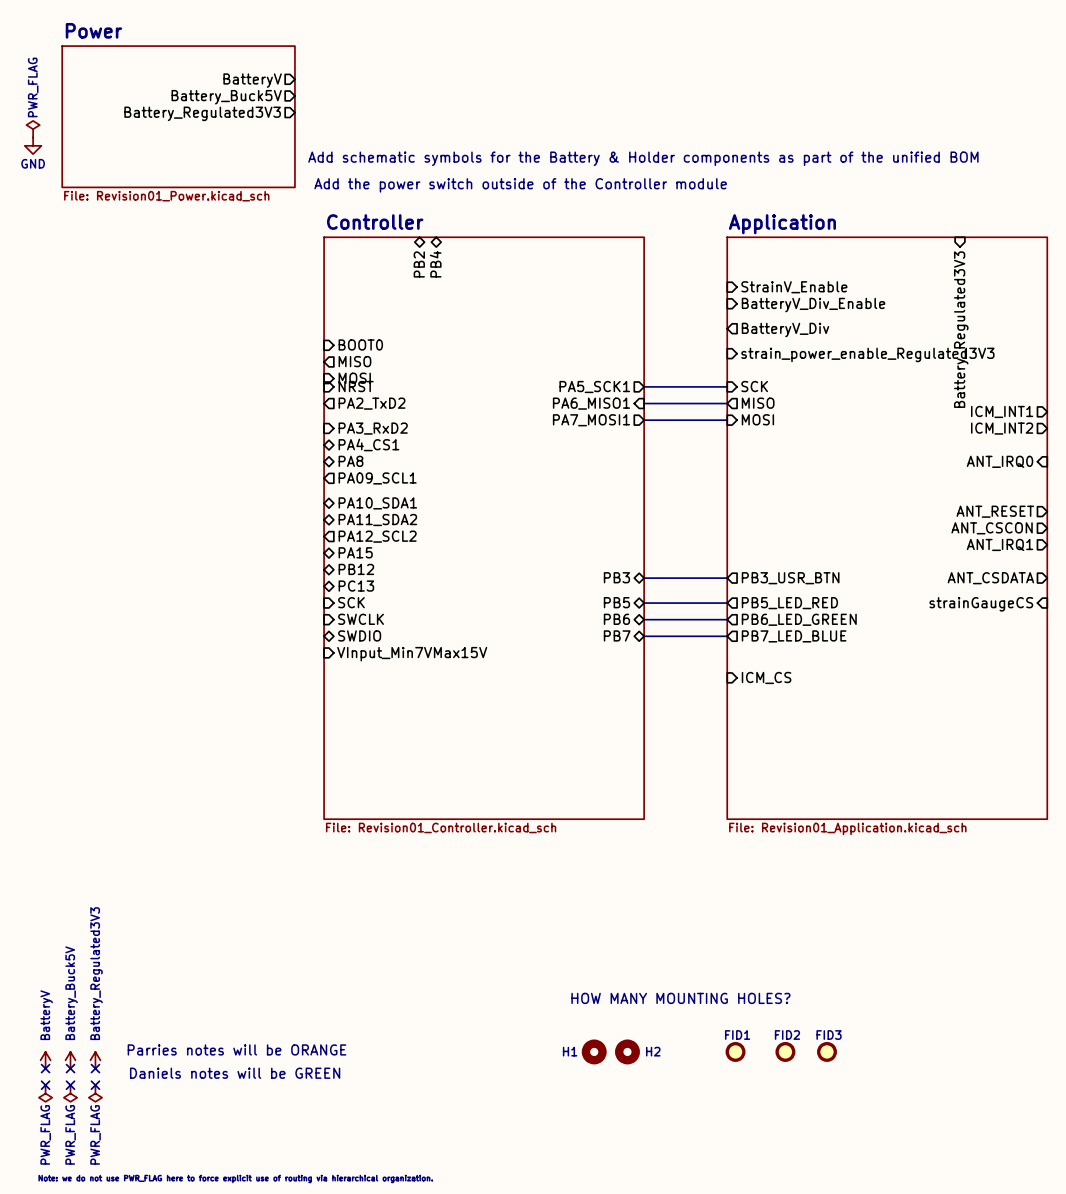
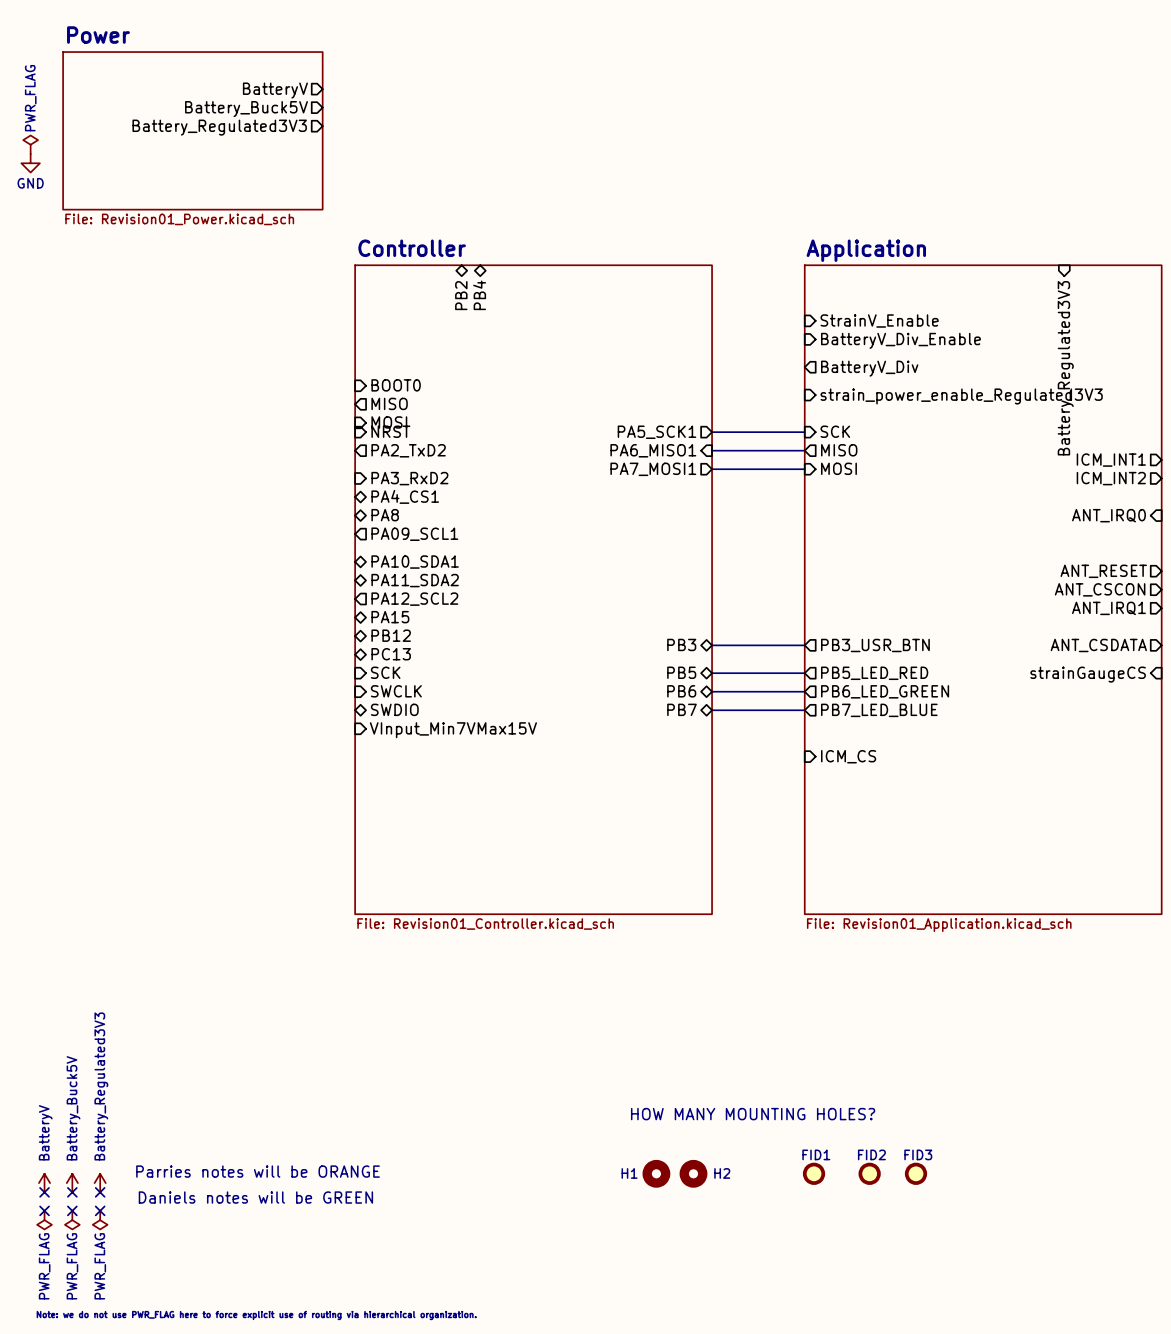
text: Add schematic symbols for the Battery & Holder components as part of the unified BOM (643, 158) -> none
text: Add the power switch outside of the Controller module (520, 185) -> none

